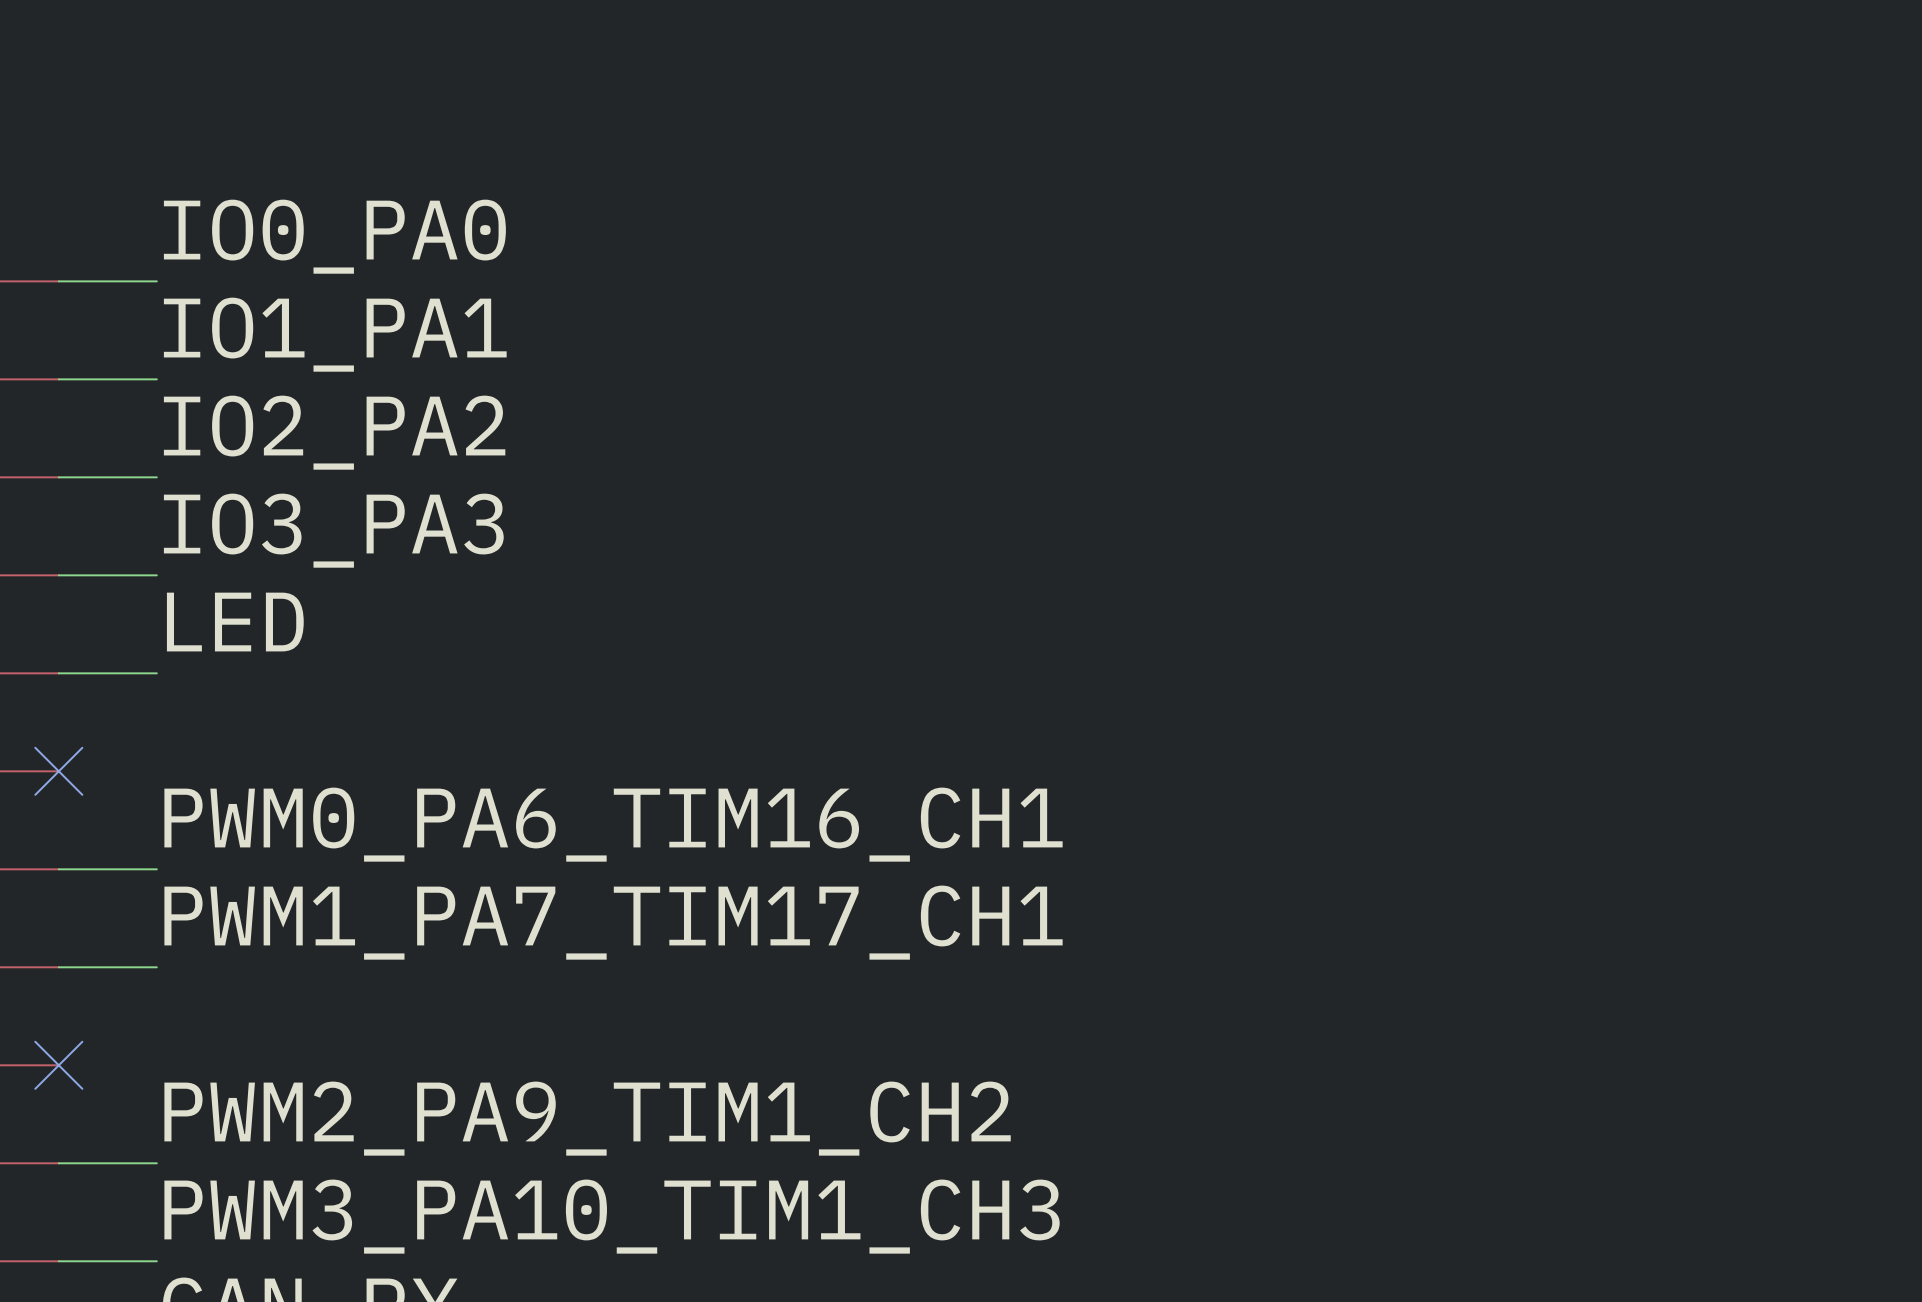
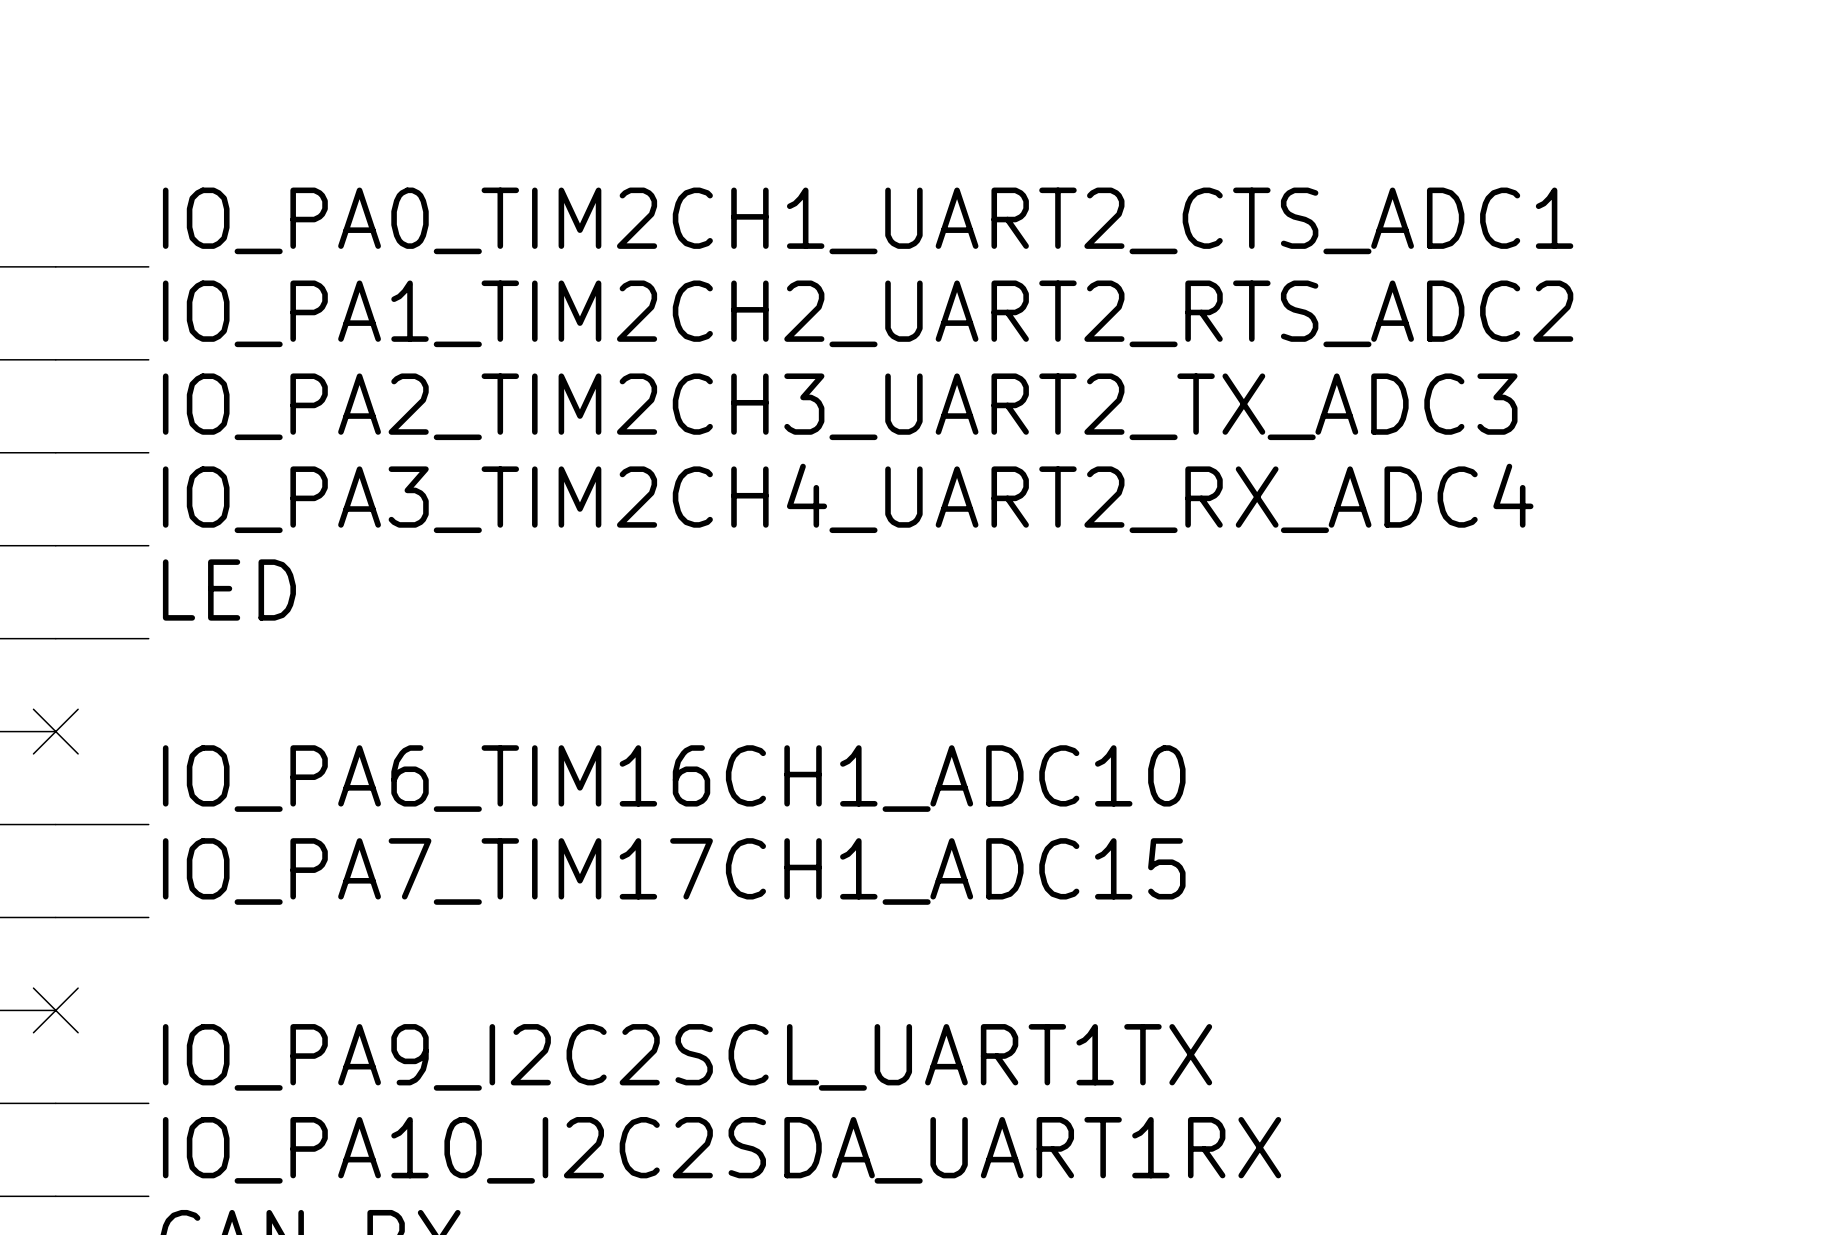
label: IO0_PA0 (334, 236) -> IO_PA0_TIM2CH1_UART2_CTS_ADC1 (868, 220)
label: IO1_PA1 (335, 334) -> IO_PA1_TIM2CH2_UART2_RTS_ADC2 (868, 313)
label: IO2_PA2 (334, 432) -> IO_PA2_TIM2CH3_UART2_TX_ADC3 (840, 406)
label: IO3_PA3 (333, 530) -> IO_PA3_TIM2CH4_UART2_RX_ADC4 (848, 498)
label: PWM0_PA6_TIM16_CH1 (613, 824) -> IO_PA6_TIM16CH1_ADC10 (674, 778)
label: PWM1_PA7_TIM17_CH1 (613, 922) -> IO_PA7_TIM17CH1_ADC15 (674, 871)
label: PWM2_PA9_TIM1_CH2 (587, 1118) -> IO_PA9_I2C2SCL_UART1TX (687, 1057)
label: PWM3_PA10_TIM1_CH3 (612, 1216) -> IO_PA10_I2C2SDA_UART1RX (722, 1150)

